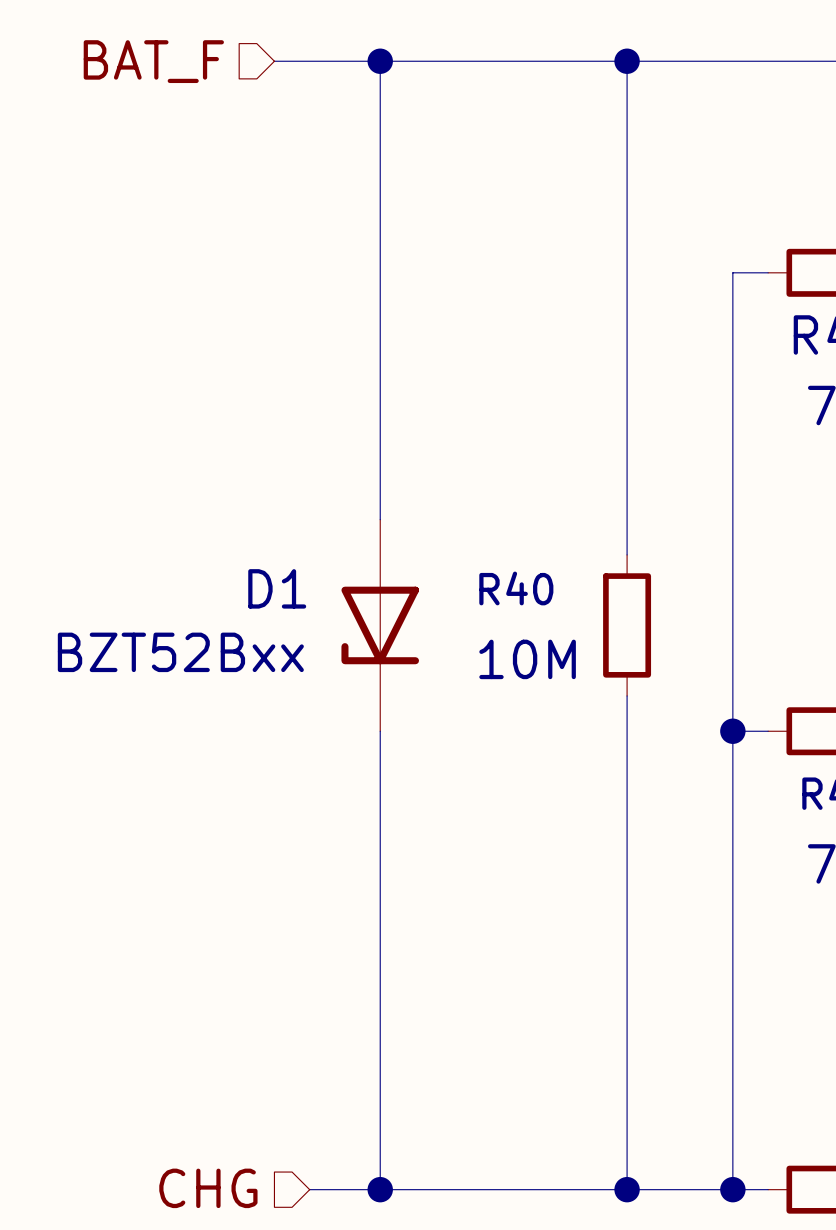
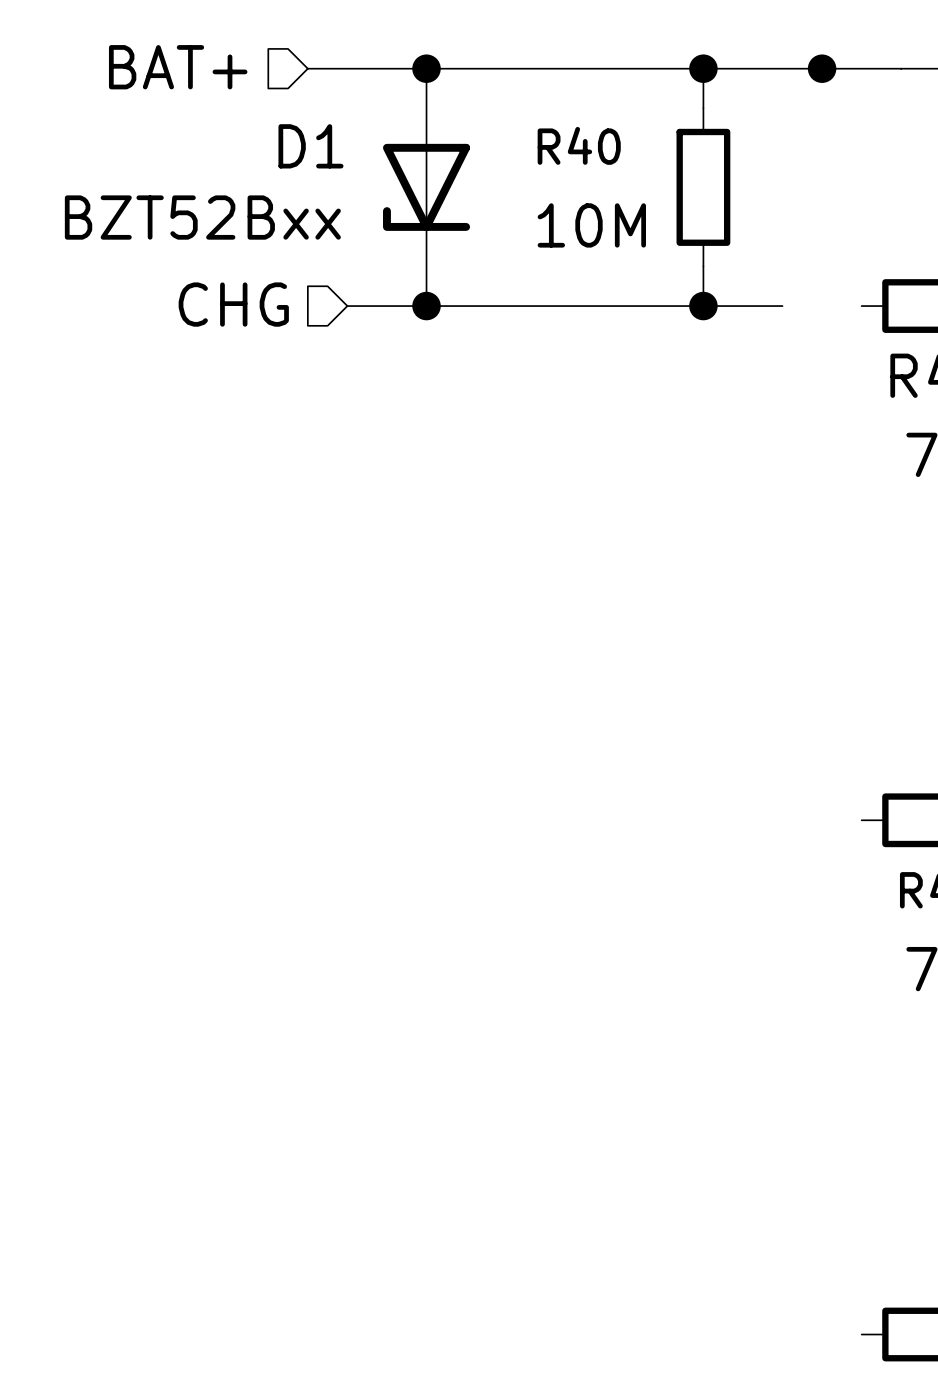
hierarchical label: BAT_F (153, 61) -> BAT+ (178, 67)
wire: (380, 61) (380, 519) -> none
junction: none -> (822, 68)
wire: (627, 96) (627, 237) -> none
hierarchical label: none -> CHG (233, 304)
wire: none -> (347, 306) (782, 306)
junction: none -> (426, 306)
wire: (627, 272) (627, 554) -> none
junction: none -> (703, 306)
wire: (768, 272) (732, 272) (732, 1189) -> none
D1 position: (380, 625) -> (426, 187)
R40 position: (627, 625) -> (703, 187)
wire: (627, 695) (627, 1189) -> none
wire: (380, 731) (380, 1189) -> none
wire: (732, 731) (768, 731) -> none
junction: (732, 731) -> none
hierarchical label: CHG (208, 1188) -> none
wire: (309, 1189) (768, 1189) -> none
junction: (380, 1189) -> none
junction: (627, 1189) -> none
junction: (732, 1189) -> none

